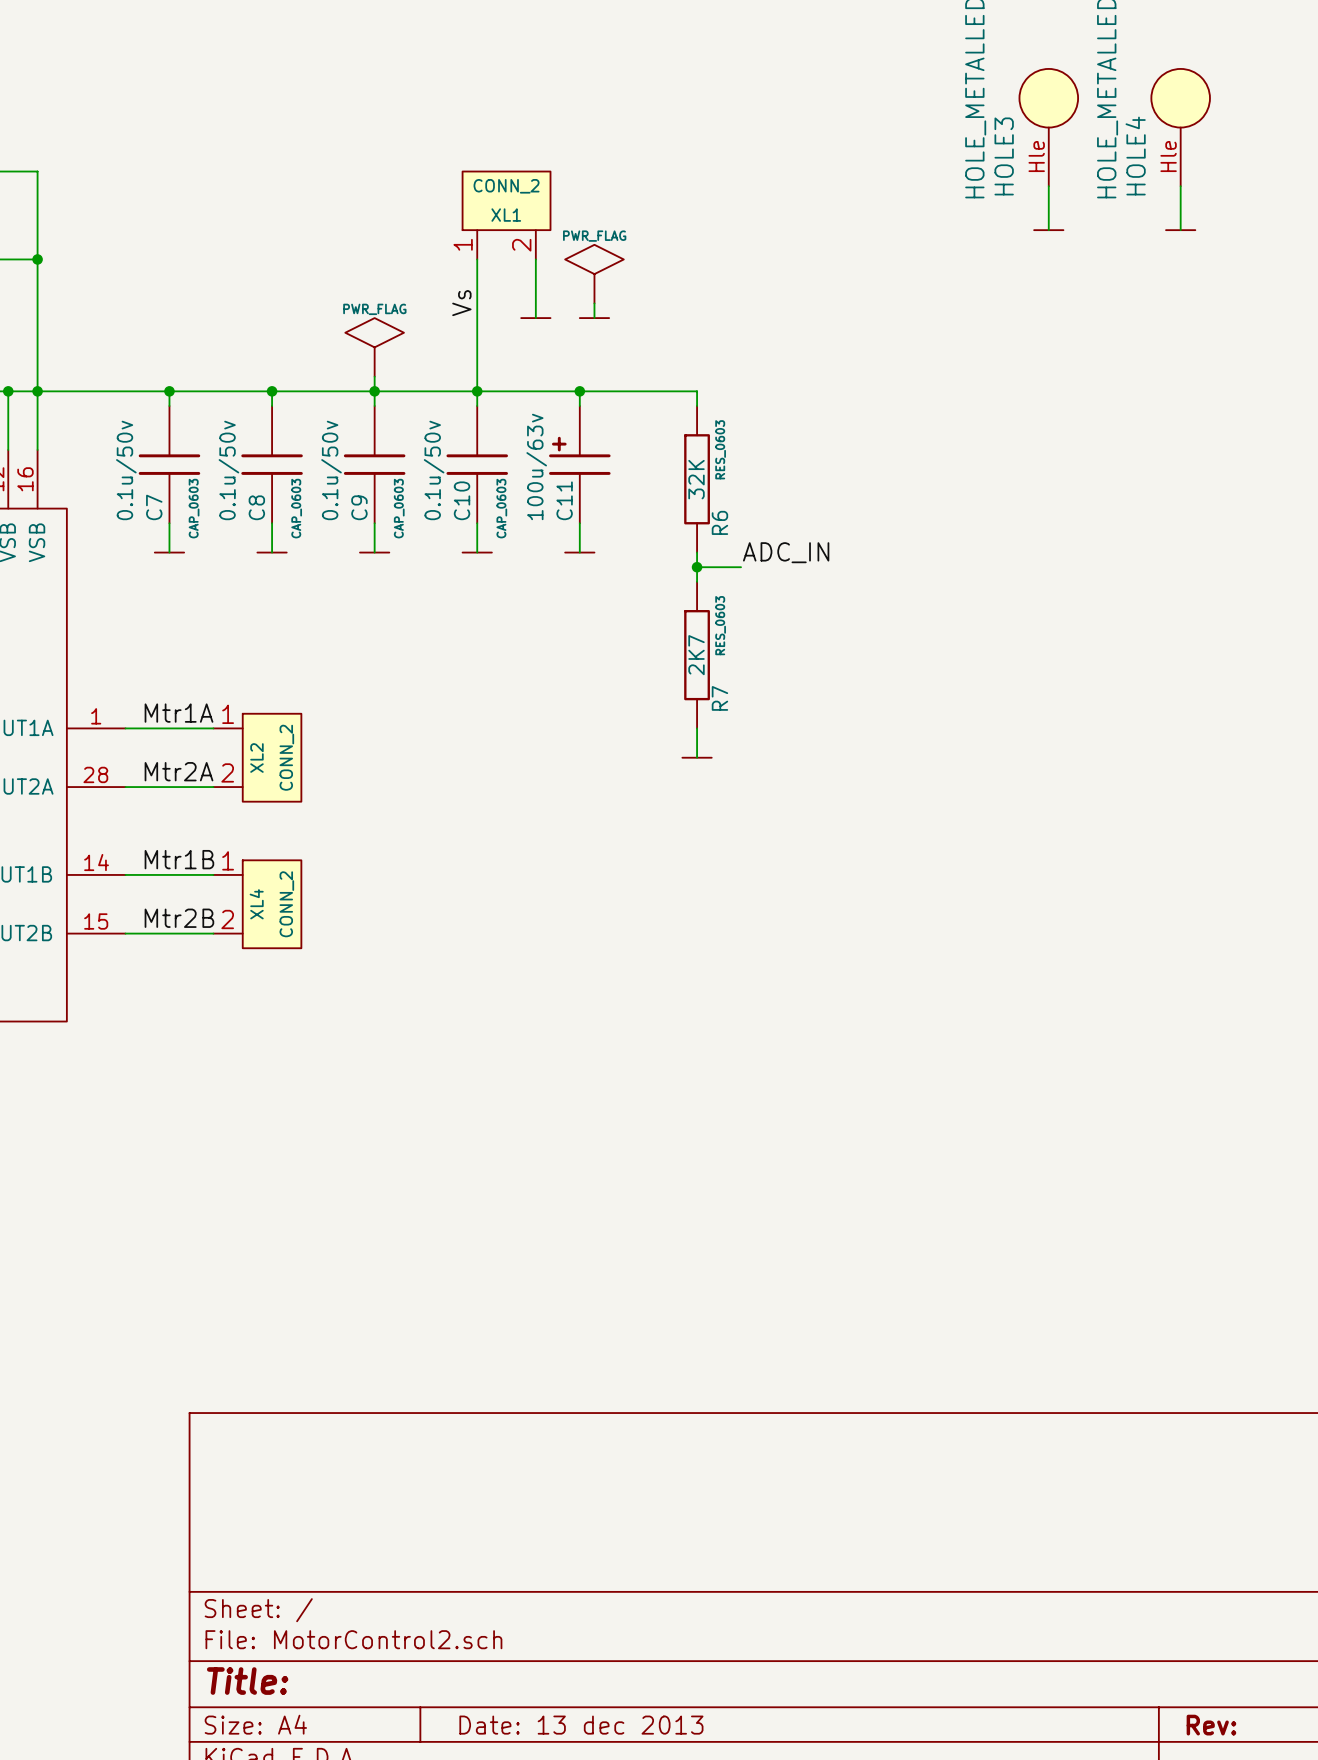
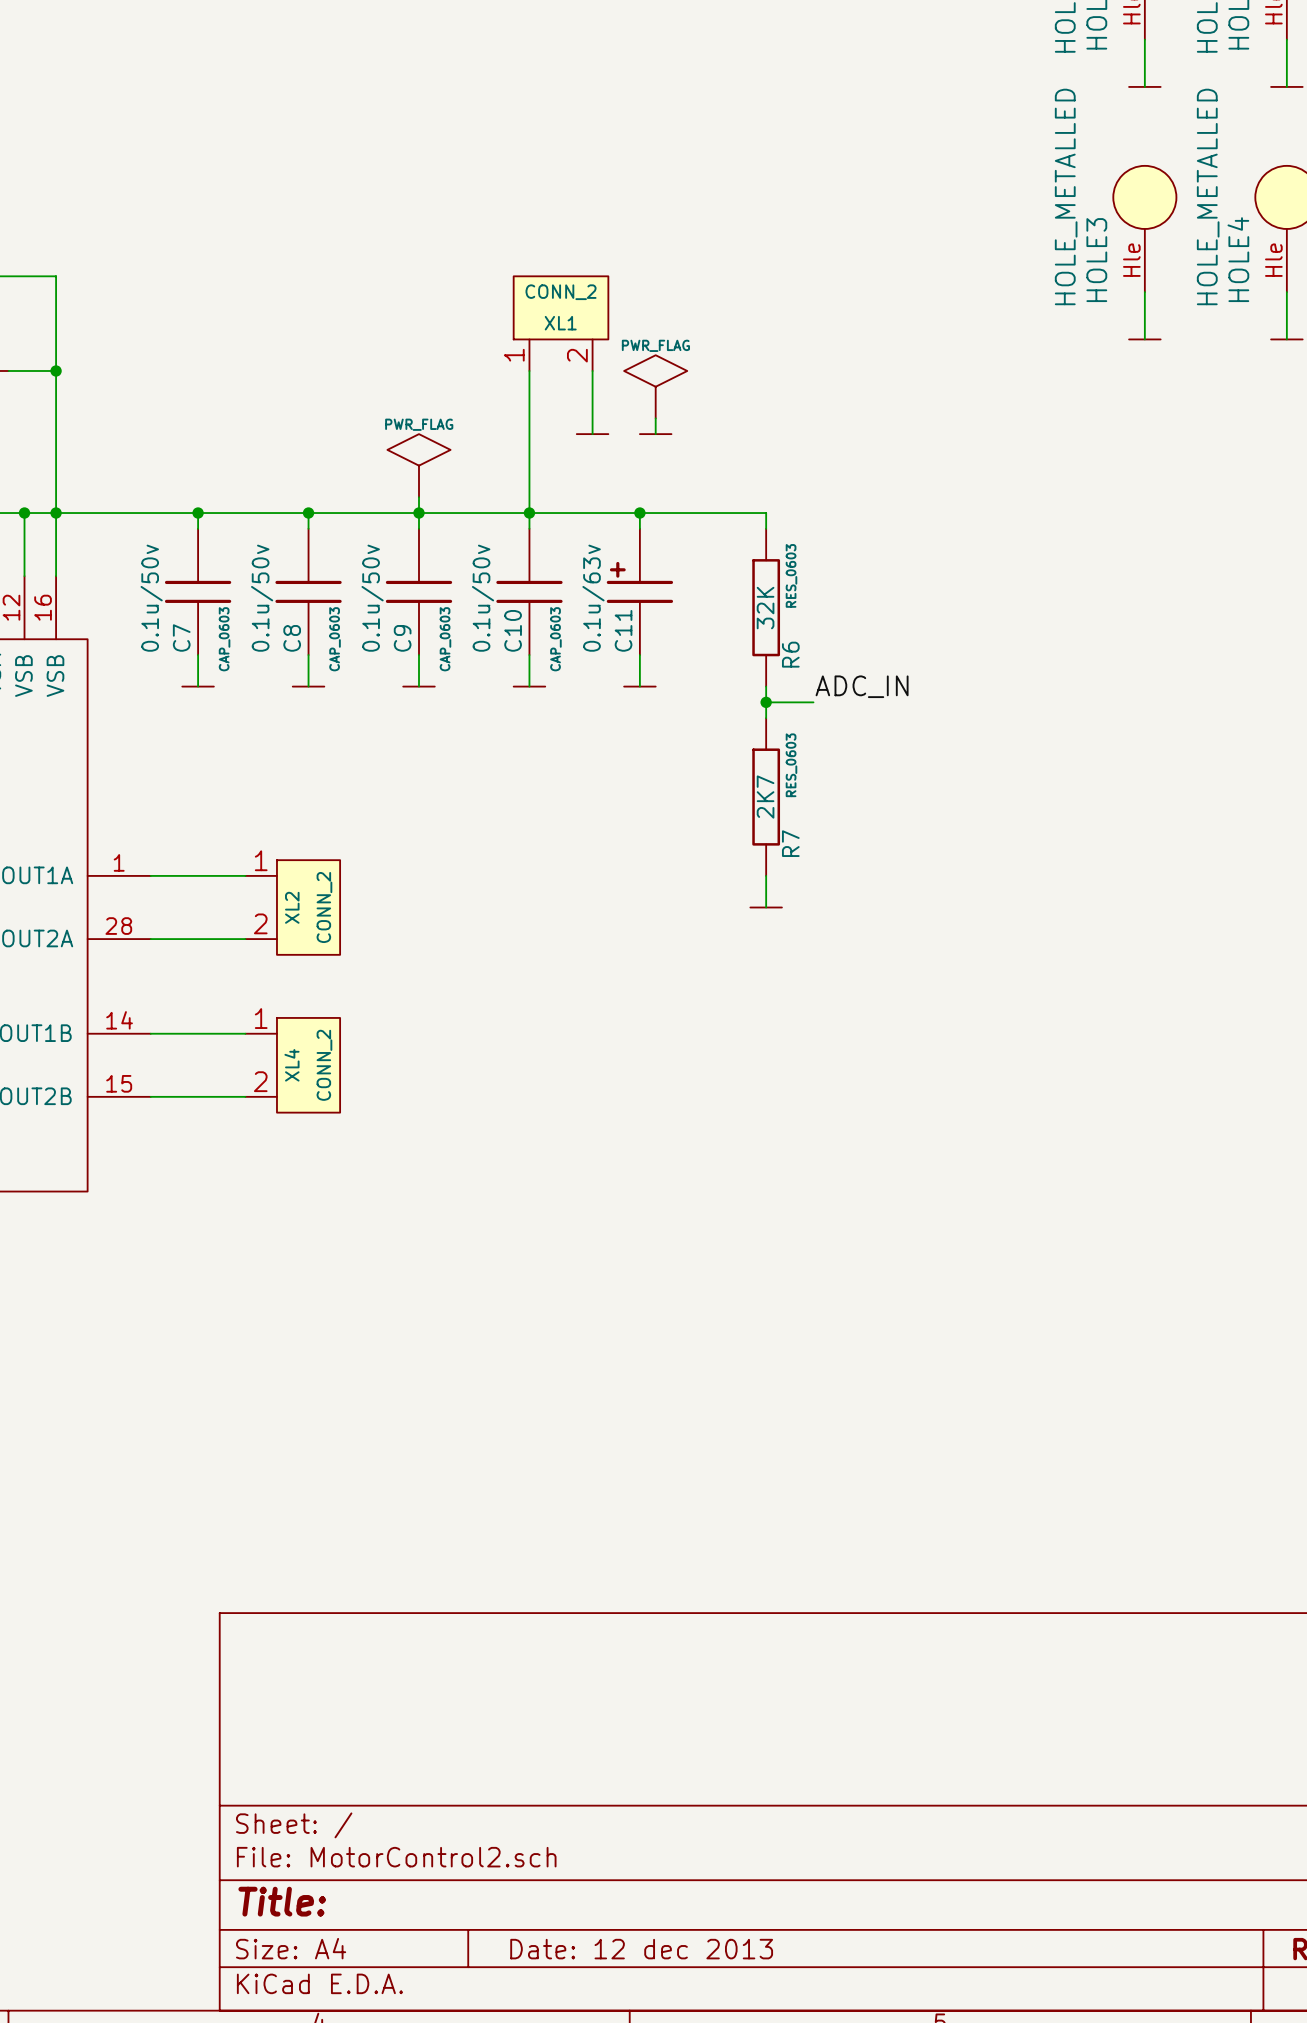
label: Vs (461, 303) -> none
C11 value: 100u/63v (536, 466) -> 0.1u/63v (593, 598)
label: Mtr1A (179, 713) -> none
label: Mtr2A (179, 771) -> none
label: Mtr1B (179, 859) -> none
label: Mtr2B (179, 918) -> none
title block: Date: 13 dec 2013 (581, 1725) -> Date: 12 dec 2013 (641, 1949)

